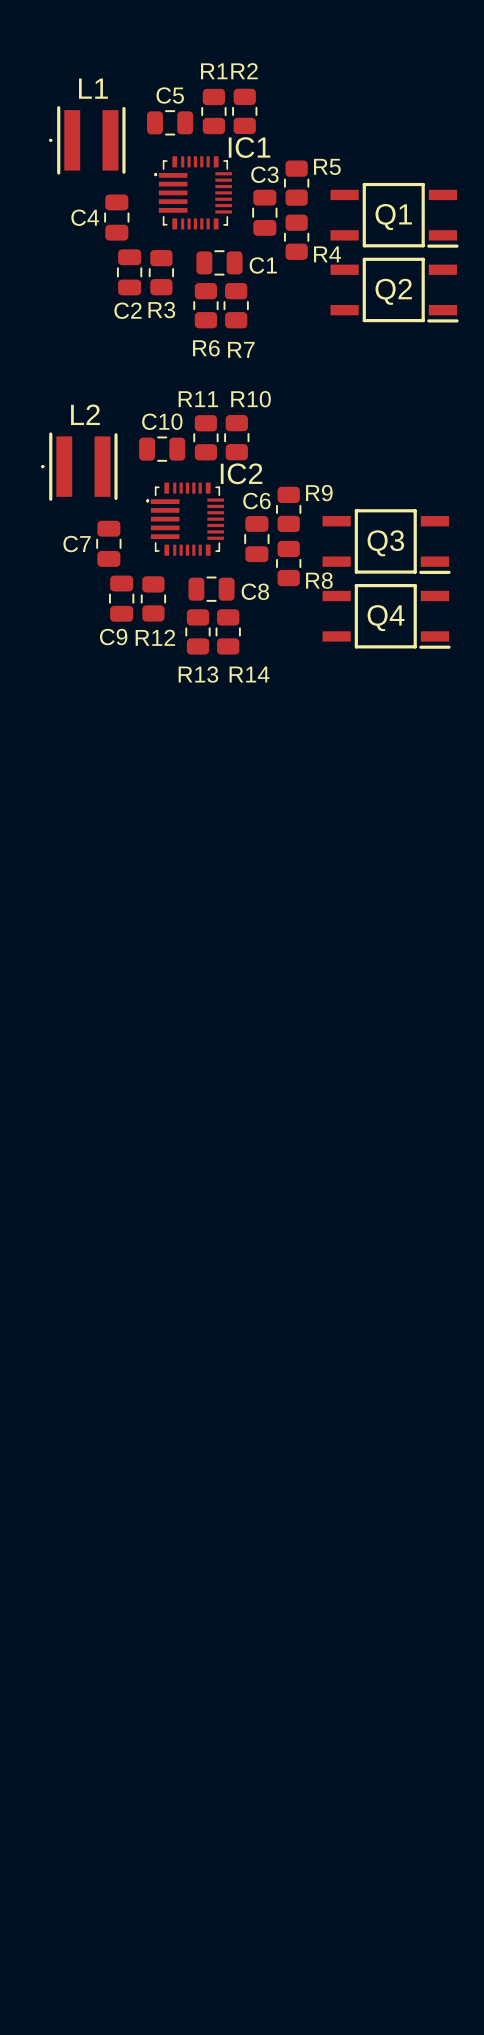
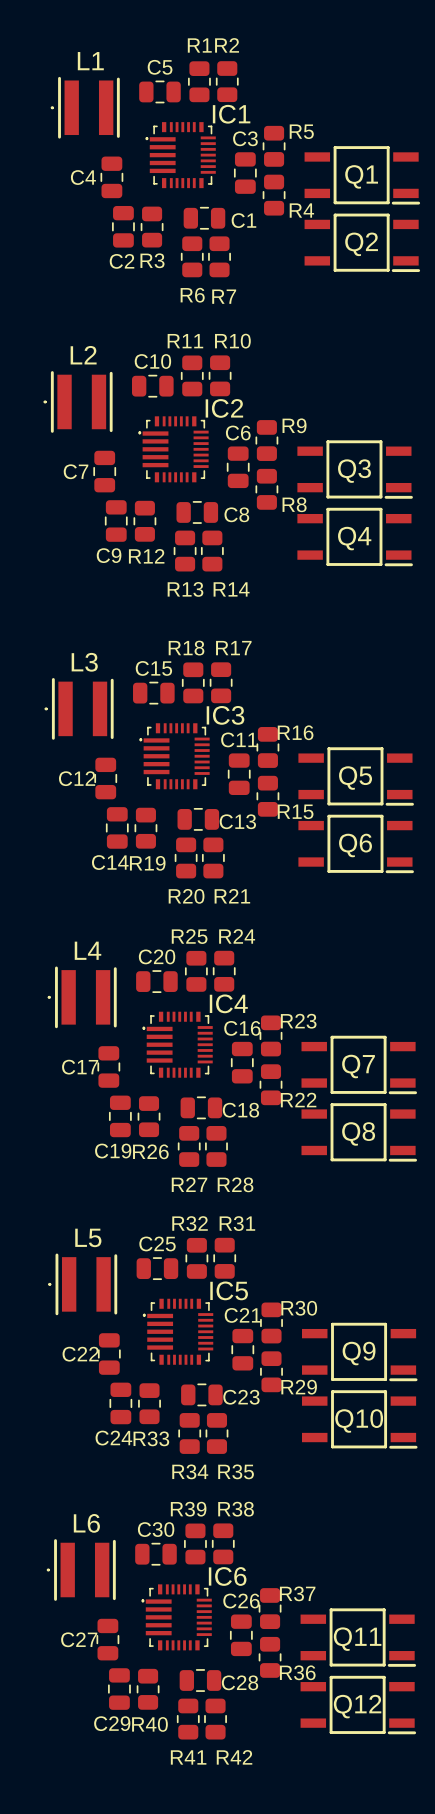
R18: none -> (193, 682)
R17: none -> (221, 682)
C15: none -> (153, 693)
L3: none -> (79, 708)
R16: none -> (267, 747)
IC3: none -> (174, 756)
C11: none -> (239, 774)
Q5: none -> (356, 776)
C12: none -> (105, 778)
R15: none -> (267, 796)
C13: none -> (198, 819)
C14: none -> (117, 827)
R19: none -> (145, 828)
Q6: none -> (356, 843)
R20: none -> (186, 857)
R21: none -> (213, 857)
R24: none -> (224, 971)
R25: none -> (196, 971)
C20: none -> (156, 981)
L4: none -> (82, 997)
R23: none -> (271, 1035)
IC4: none -> (177, 1044)
C16: none -> (242, 1062)
Q7: none -> (359, 1064)
C17: none -> (108, 1066)
R22: none -> (271, 1084)
C18: none -> (201, 1107)
C19: none -> (120, 1116)
R26: none -> (149, 1116)
Q8: none -> (359, 1132)
R27: none -> (189, 1146)
R28: none -> (216, 1146)
R32: none -> (196, 1258)
R31: none -> (224, 1258)
C25: none -> (157, 1268)
L5: none -> (82, 1284)
R30: none -> (271, 1322)
IC5: none -> (178, 1331)
C21: none -> (242, 1349)
Q9: none -> (359, 1351)
C22: none -> (109, 1354)
R29: none -> (271, 1371)
C23: none -> (201, 1394)
C24: none -> (120, 1403)
R33: none -> (149, 1403)
Q10: none -> (359, 1419)
R34: none -> (189, 1433)
R35: none -> (216, 1433)
R39: none -> (195, 1543)
R38: none -> (223, 1543)
C30: none -> (155, 1554)
L6: none -> (81, 1570)
R37: none -> (270, 1608)
IC6: none -> (176, 1617)
C26: none -> (241, 1635)
Q11: none -> (358, 1637)
C27: none -> (107, 1639)
R36: none -> (270, 1657)
C28: none -> (200, 1680)
C29: none -> (119, 1689)
R40: none -> (148, 1689)
Q12: none -> (358, 1705)
R41: none -> (188, 1719)
R42: none -> (215, 1719)

